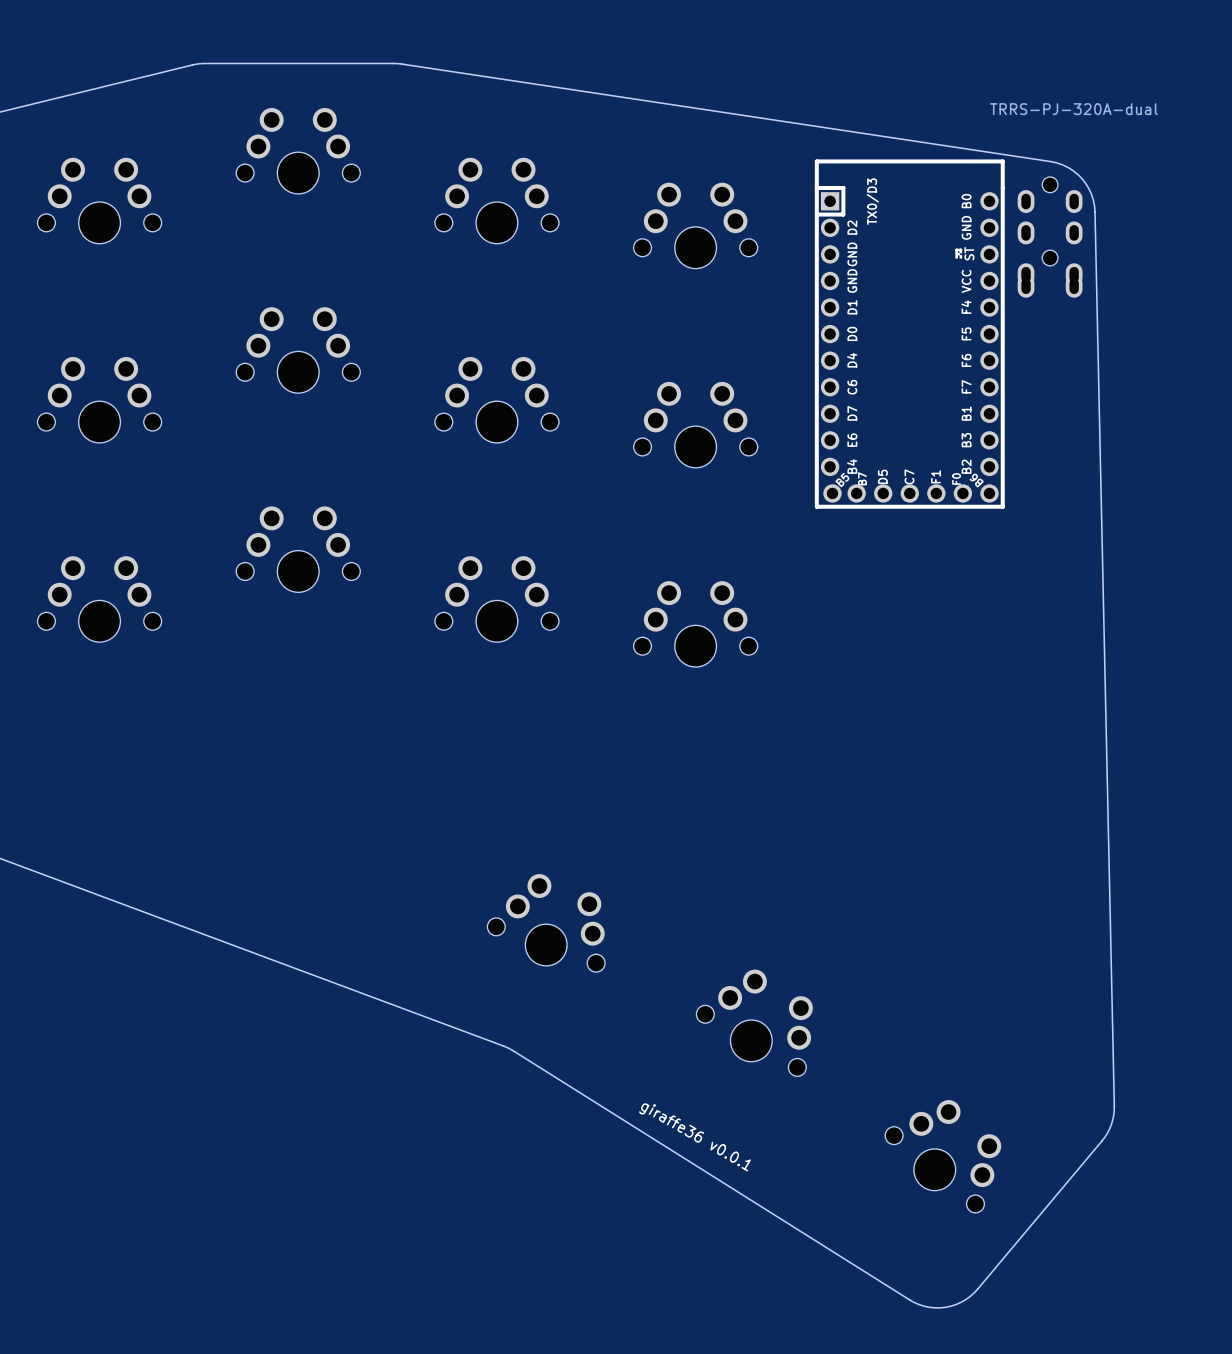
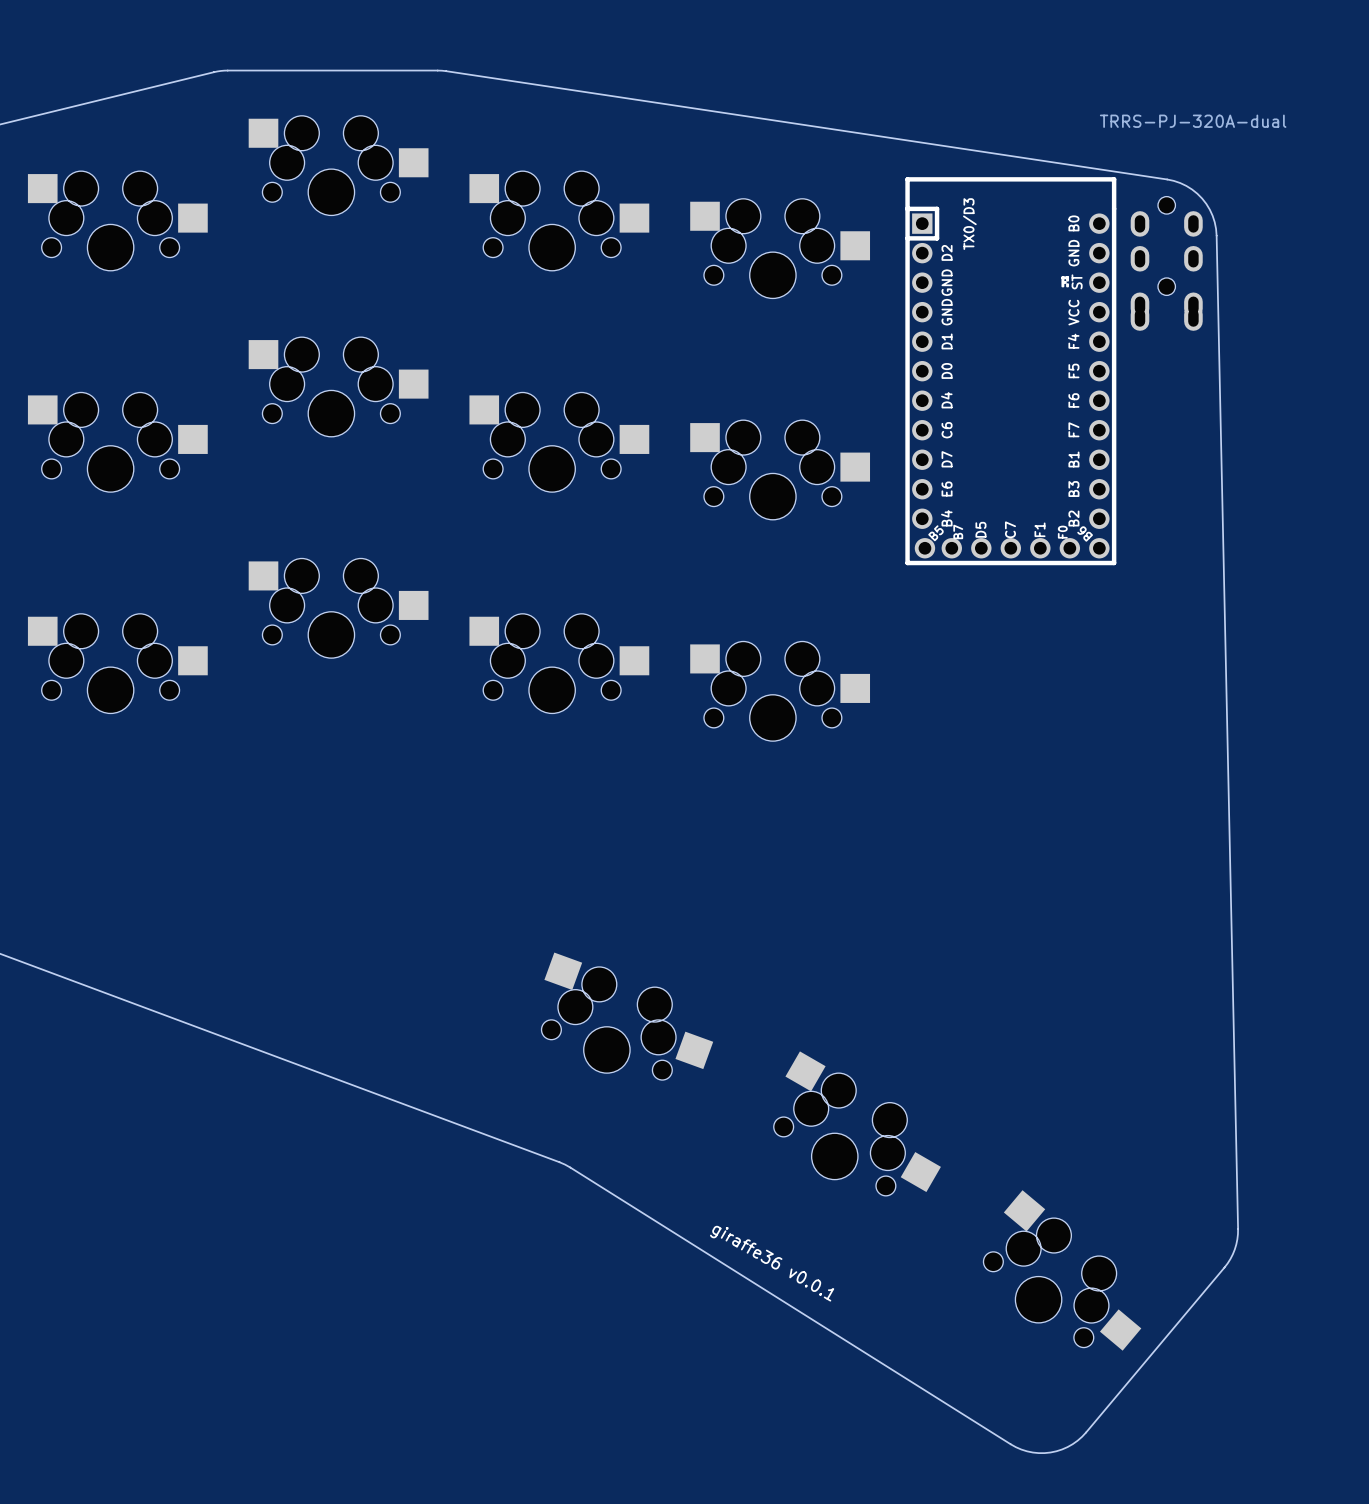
part footprint: [236, 107, 361, 194] -> [248, 115, 429, 216]
part footprint: [37, 157, 162, 244] -> [27, 171, 208, 271]
part footprint: [434, 157, 559, 244] -> [469, 171, 650, 271]
part footprint: [633, 182, 758, 269] -> [690, 198, 871, 299]
part footprint: [236, 307, 361, 394] -> [248, 337, 429, 437]
part footprint: [37, 357, 162, 443] -> [27, 392, 208, 493]
part footprint: [434, 357, 559, 443] -> [469, 392, 650, 493]
part footprint: [633, 381, 758, 468] -> [690, 420, 871, 520]
part footprint: [236, 506, 361, 593] -> [248, 558, 429, 659]
part footprint: [37, 556, 162, 643] -> [27, 613, 208, 714]
part footprint: [434, 556, 559, 643] -> [469, 613, 650, 714]
part footprint: [633, 581, 758, 668] -> [690, 641, 871, 742]
part: none -> (627, 1016)
part: (546, 923) -> none
part: none -> (857, 1123)
part: (754, 1022) -> none
part: none -> (1062, 1270)
part: (943, 1156) -> none

